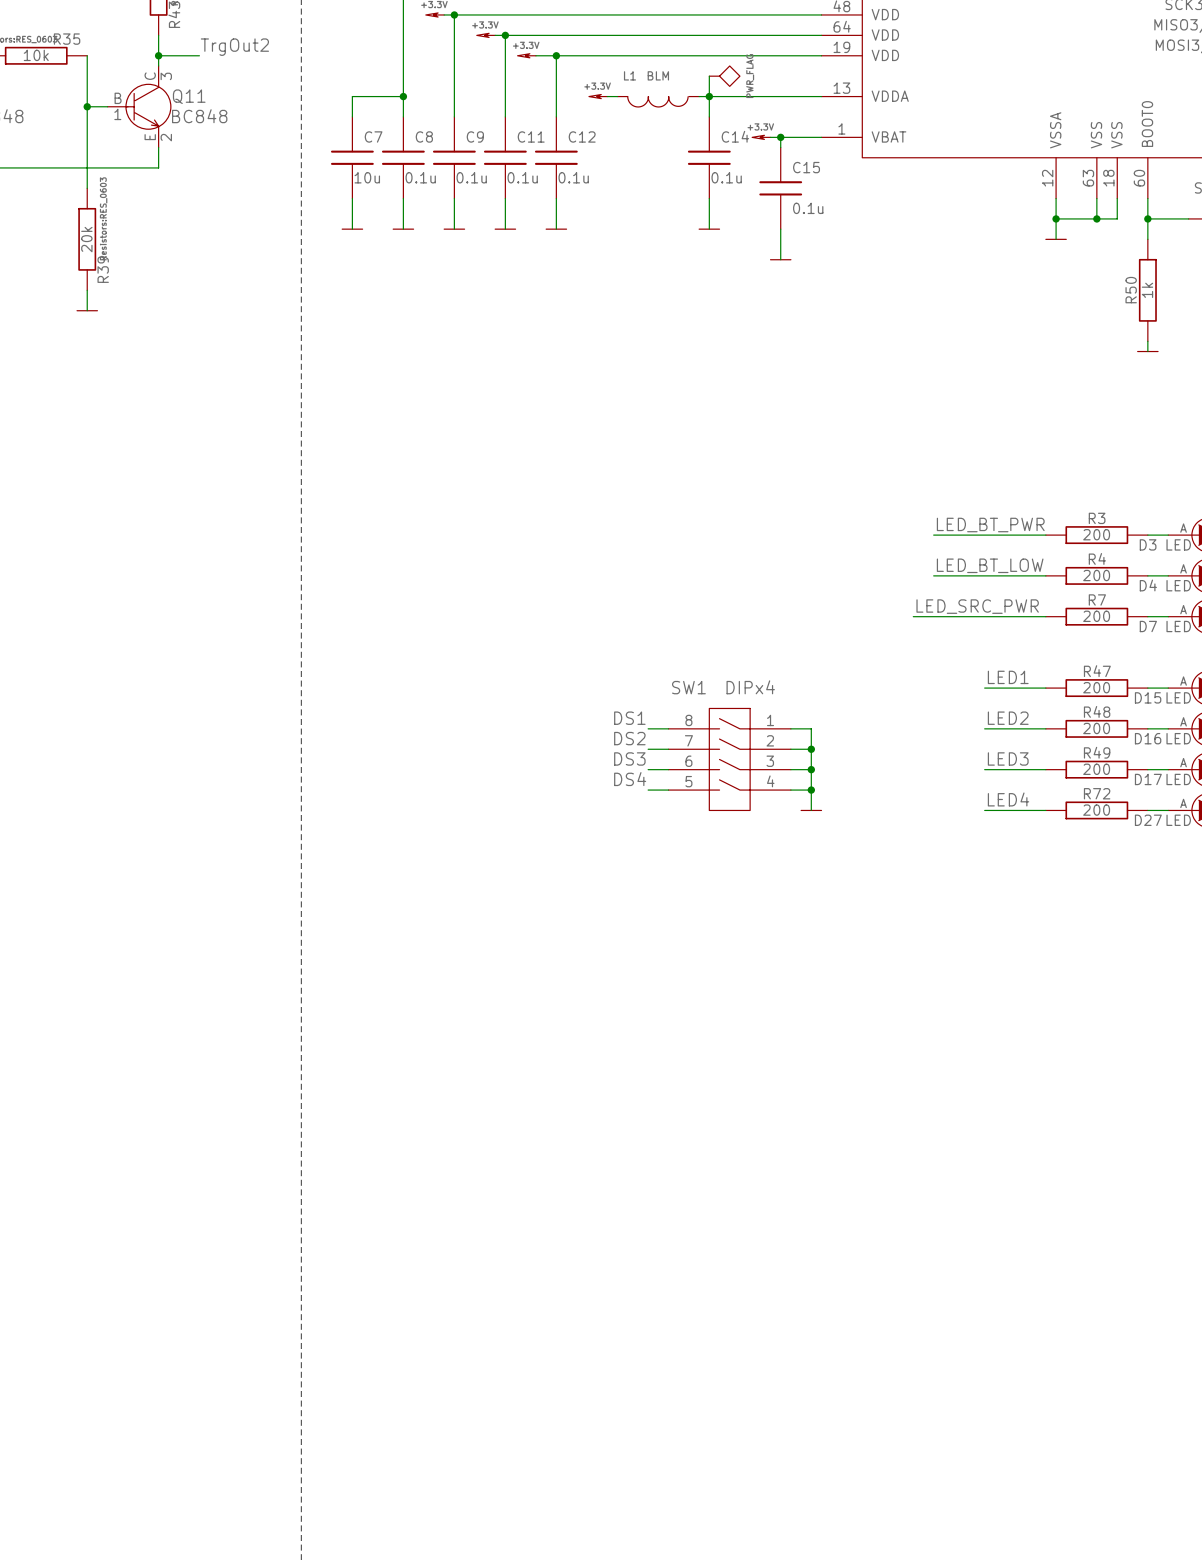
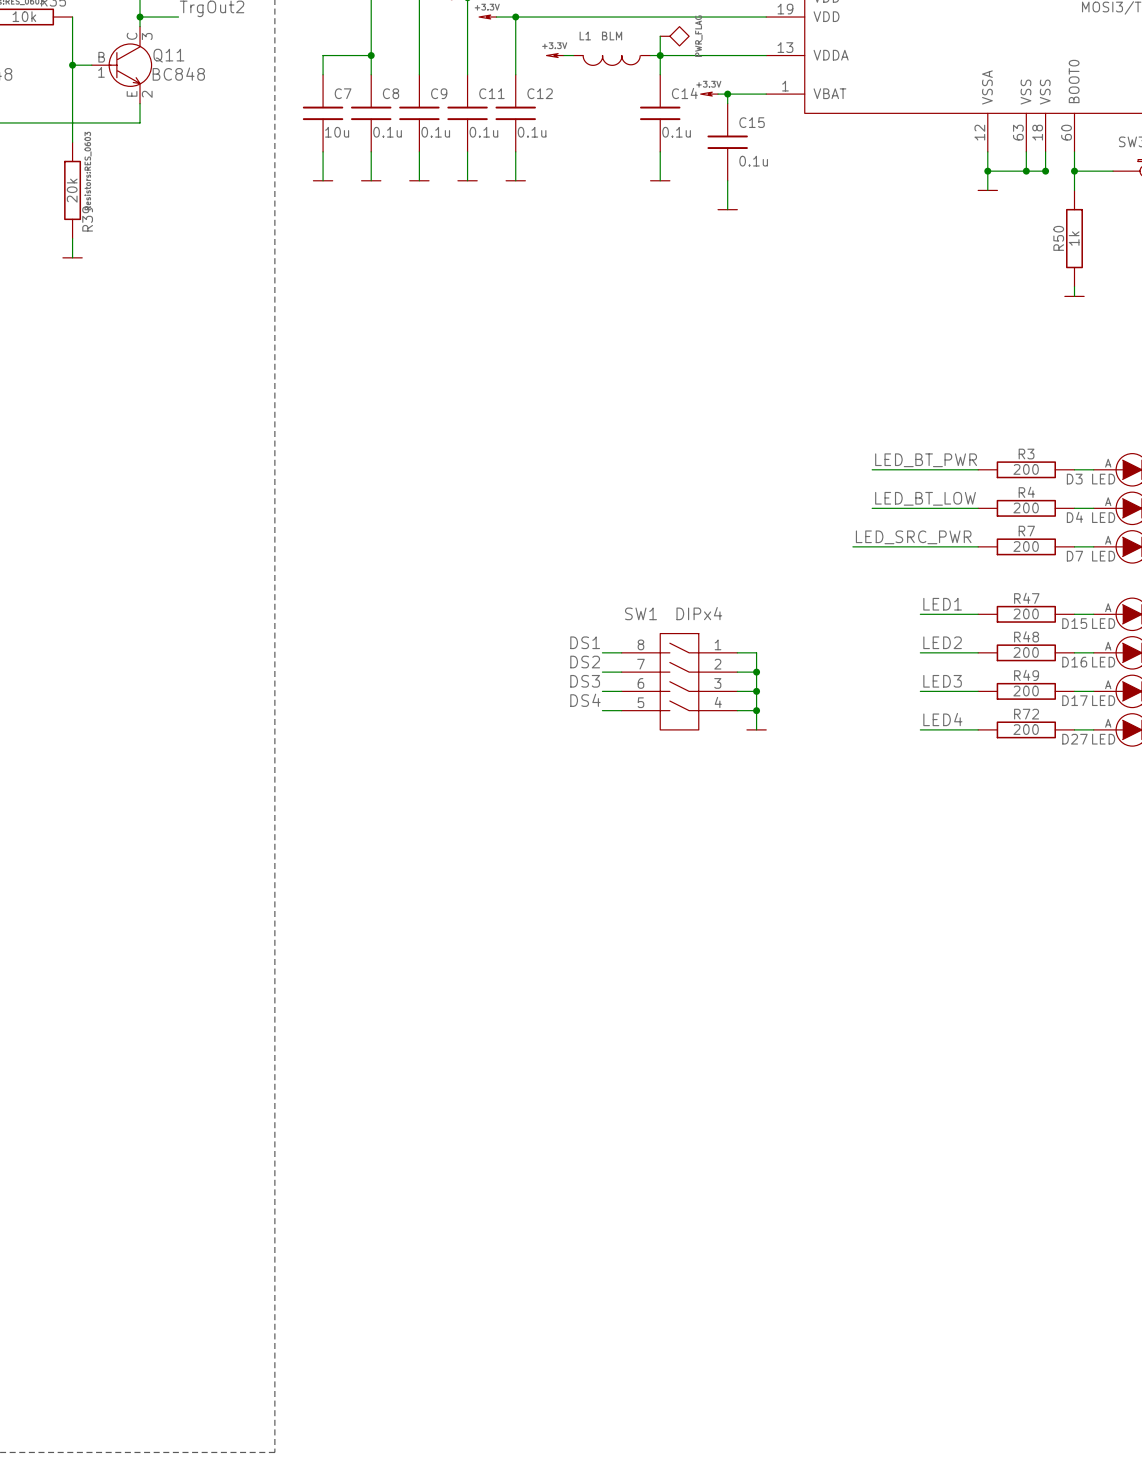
junction: none -> (1045, 171)

